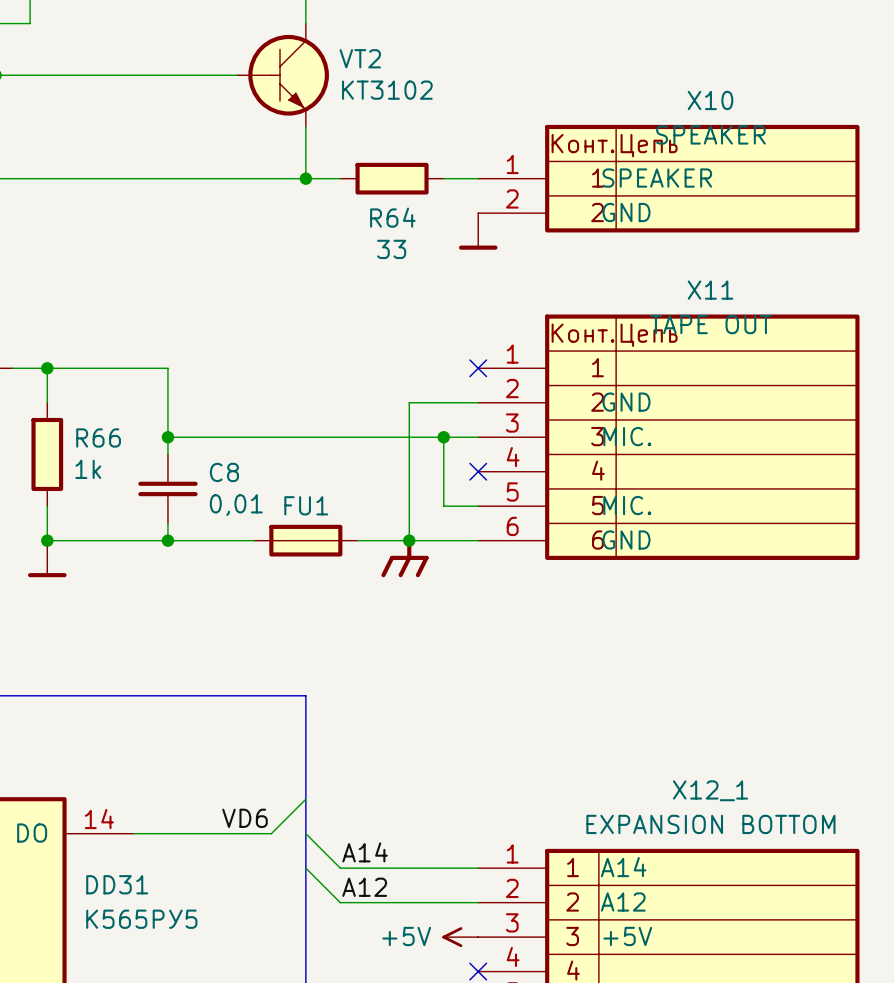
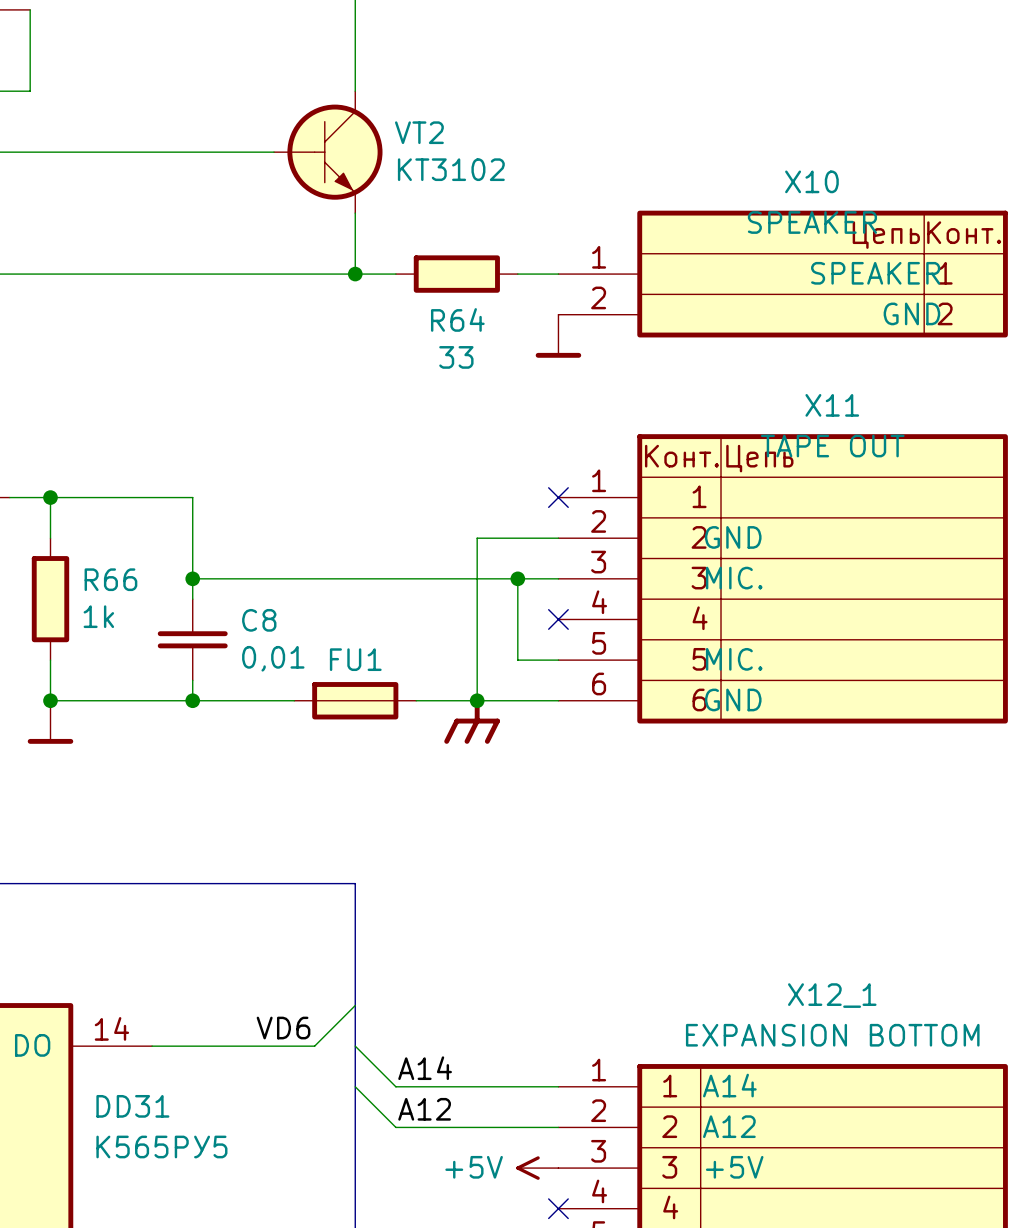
X10 symbol: [478, 124, 860, 233] -> [558, 210, 1008, 338]
X10 text position: SPEAKER (657, 178) -> SPEAKER (875, 273)
X10 text position: GND (626, 212) -> GND (911, 313)

